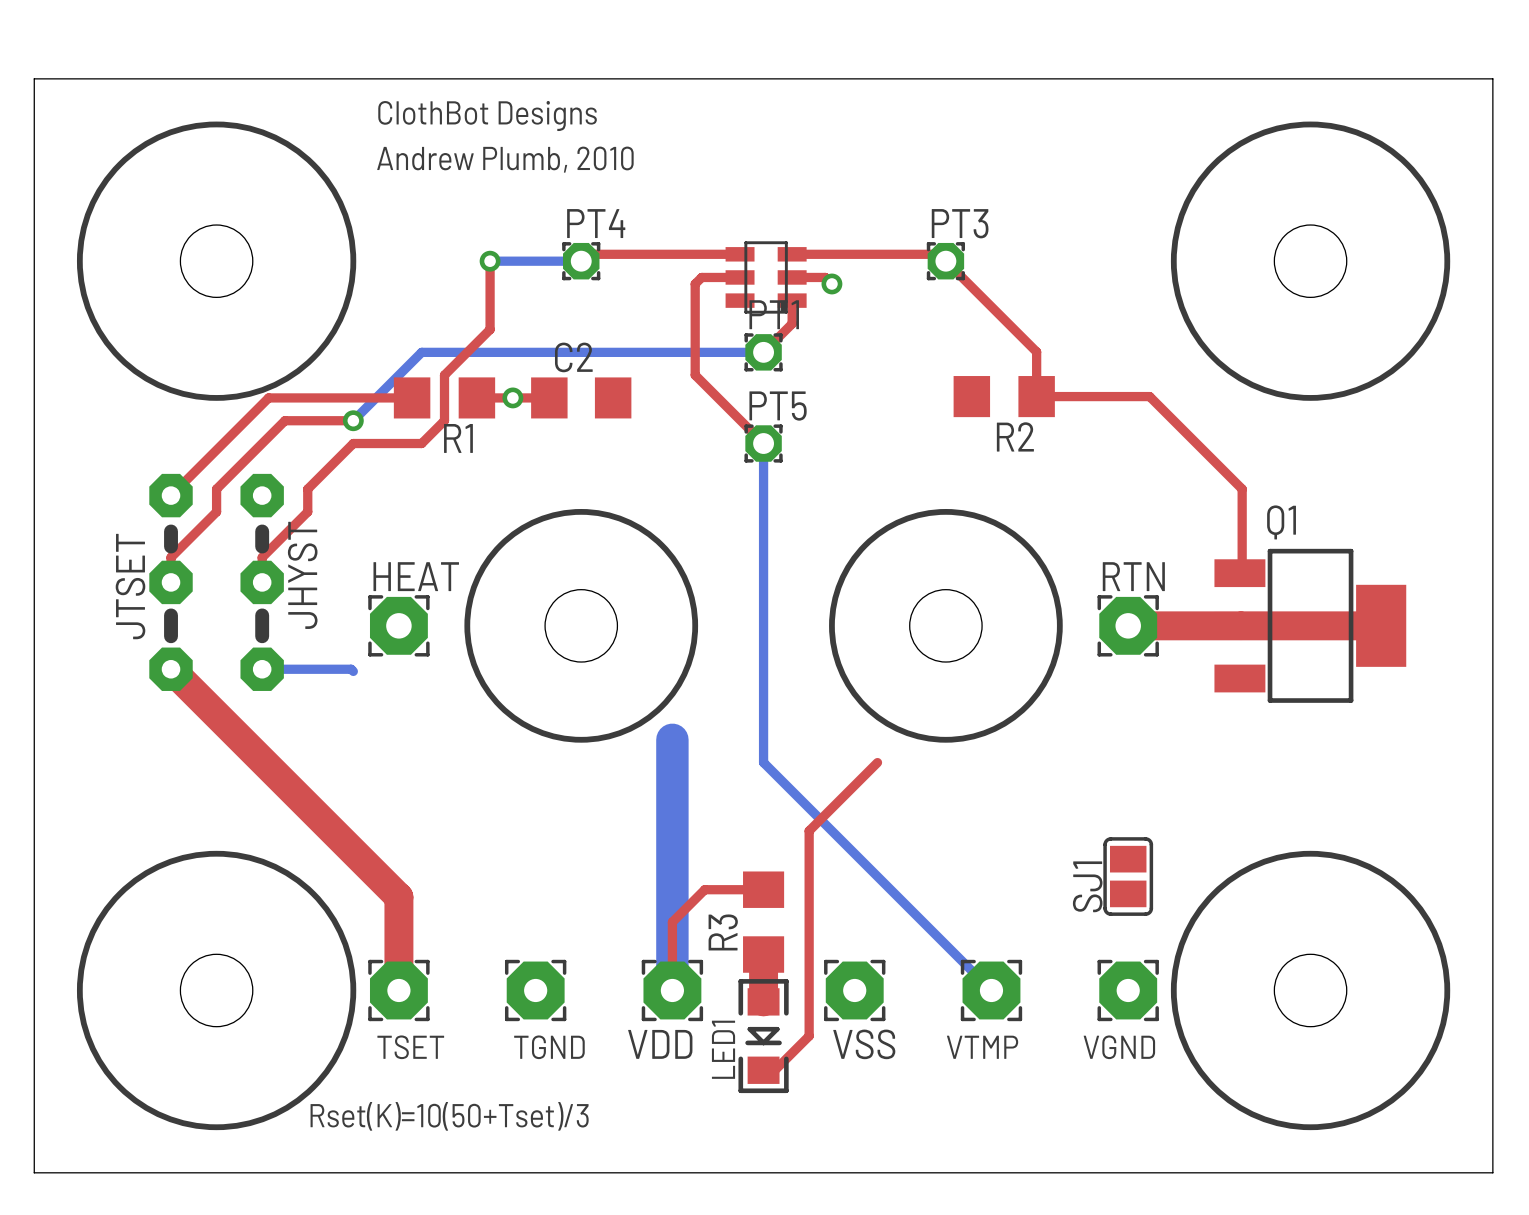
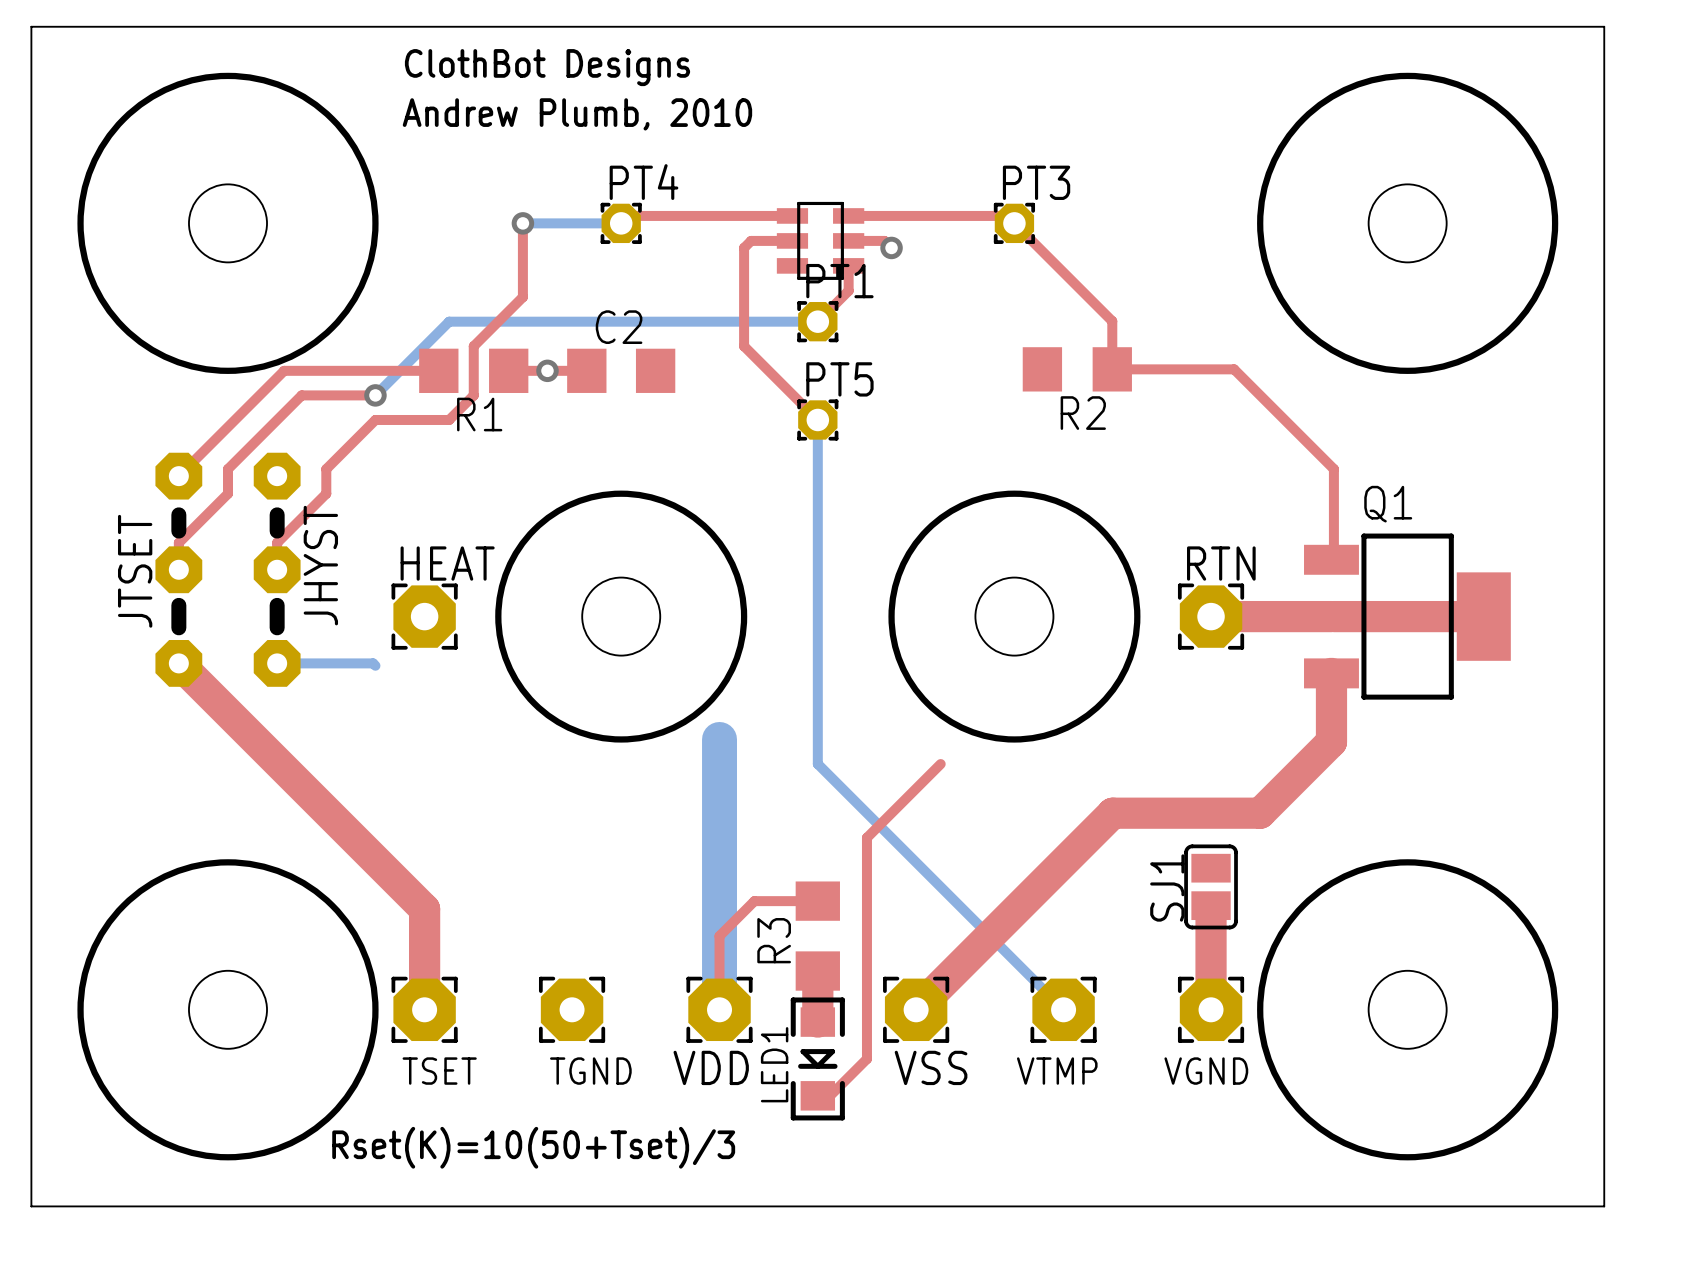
top track: none -> (1331, 673) (1331, 741) (1260, 813) (1112, 813) (916, 1009)
top track: none -> (1211, 911) (1211, 1009)

